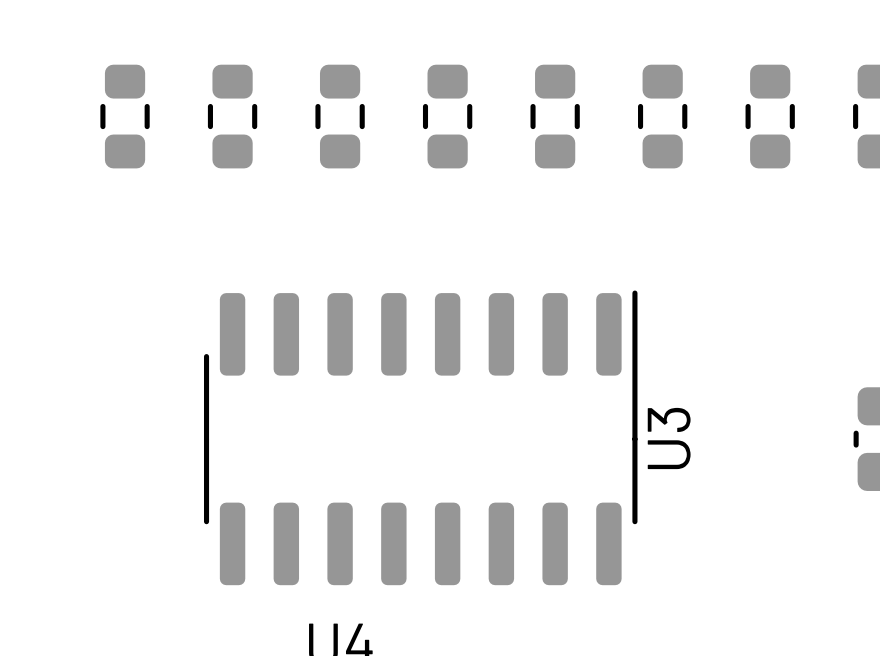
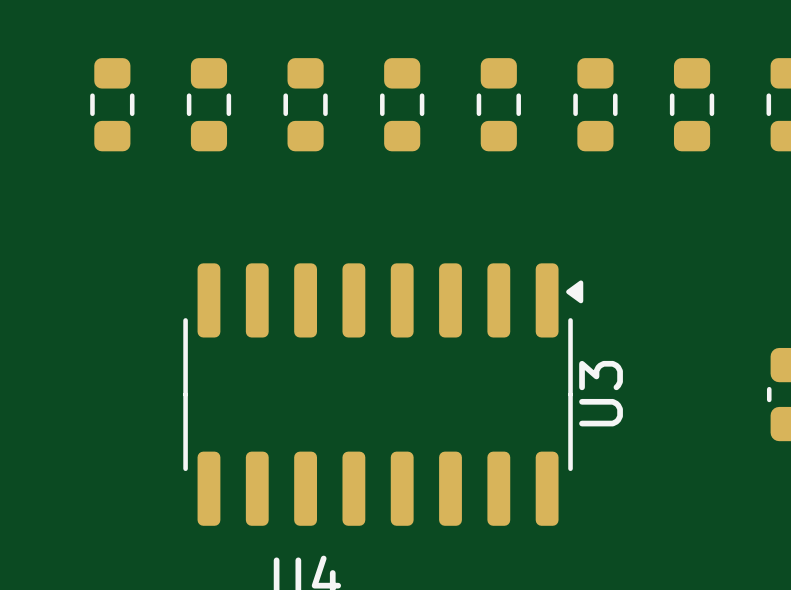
U3 footprint: [203, 290, 638, 586] -> [183, 263, 584, 526]

